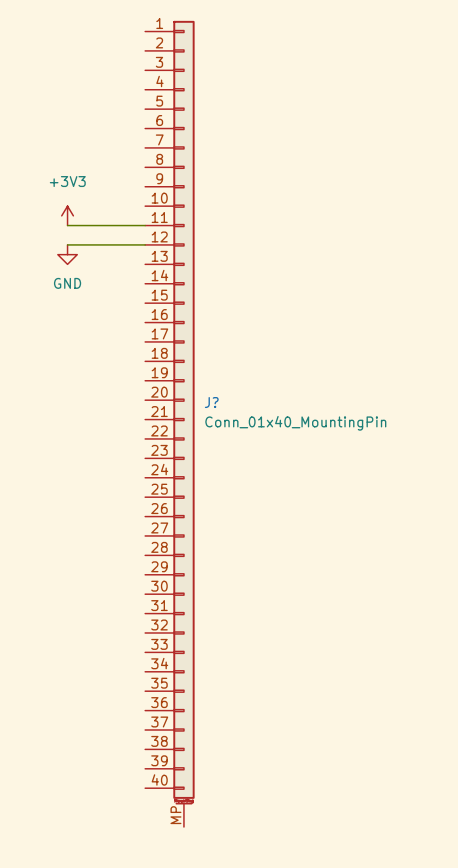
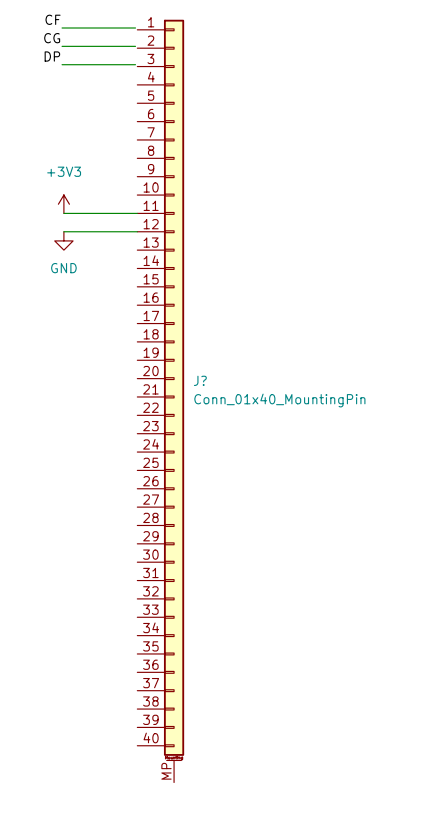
label: none -> CF (53, 19)
wire: none -> (62, 27) (135, 27)
label: none -> CG (52, 38)
wire: none -> (62, 46) (135, 46)
label: none -> DP (52, 56)
wire: none -> (62, 64) (135, 64)

